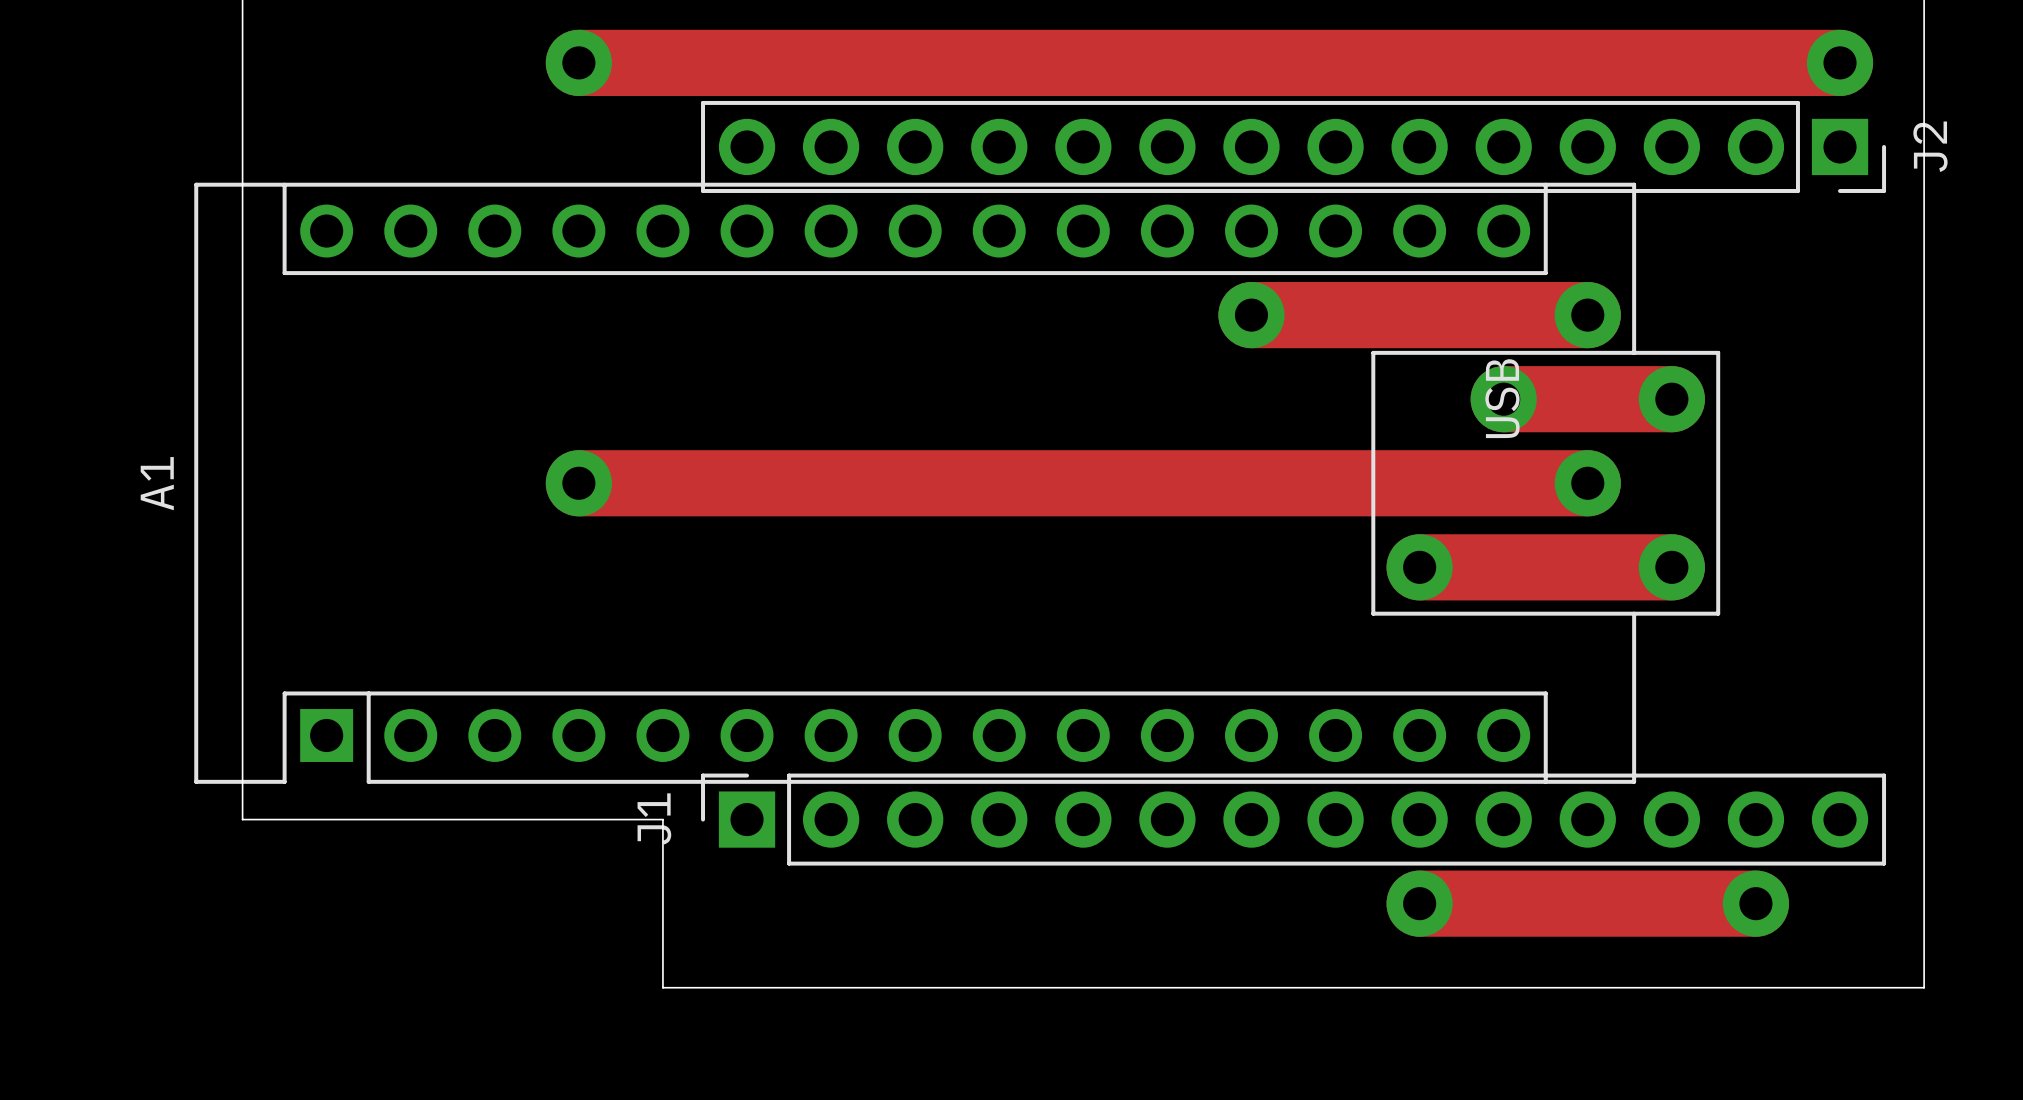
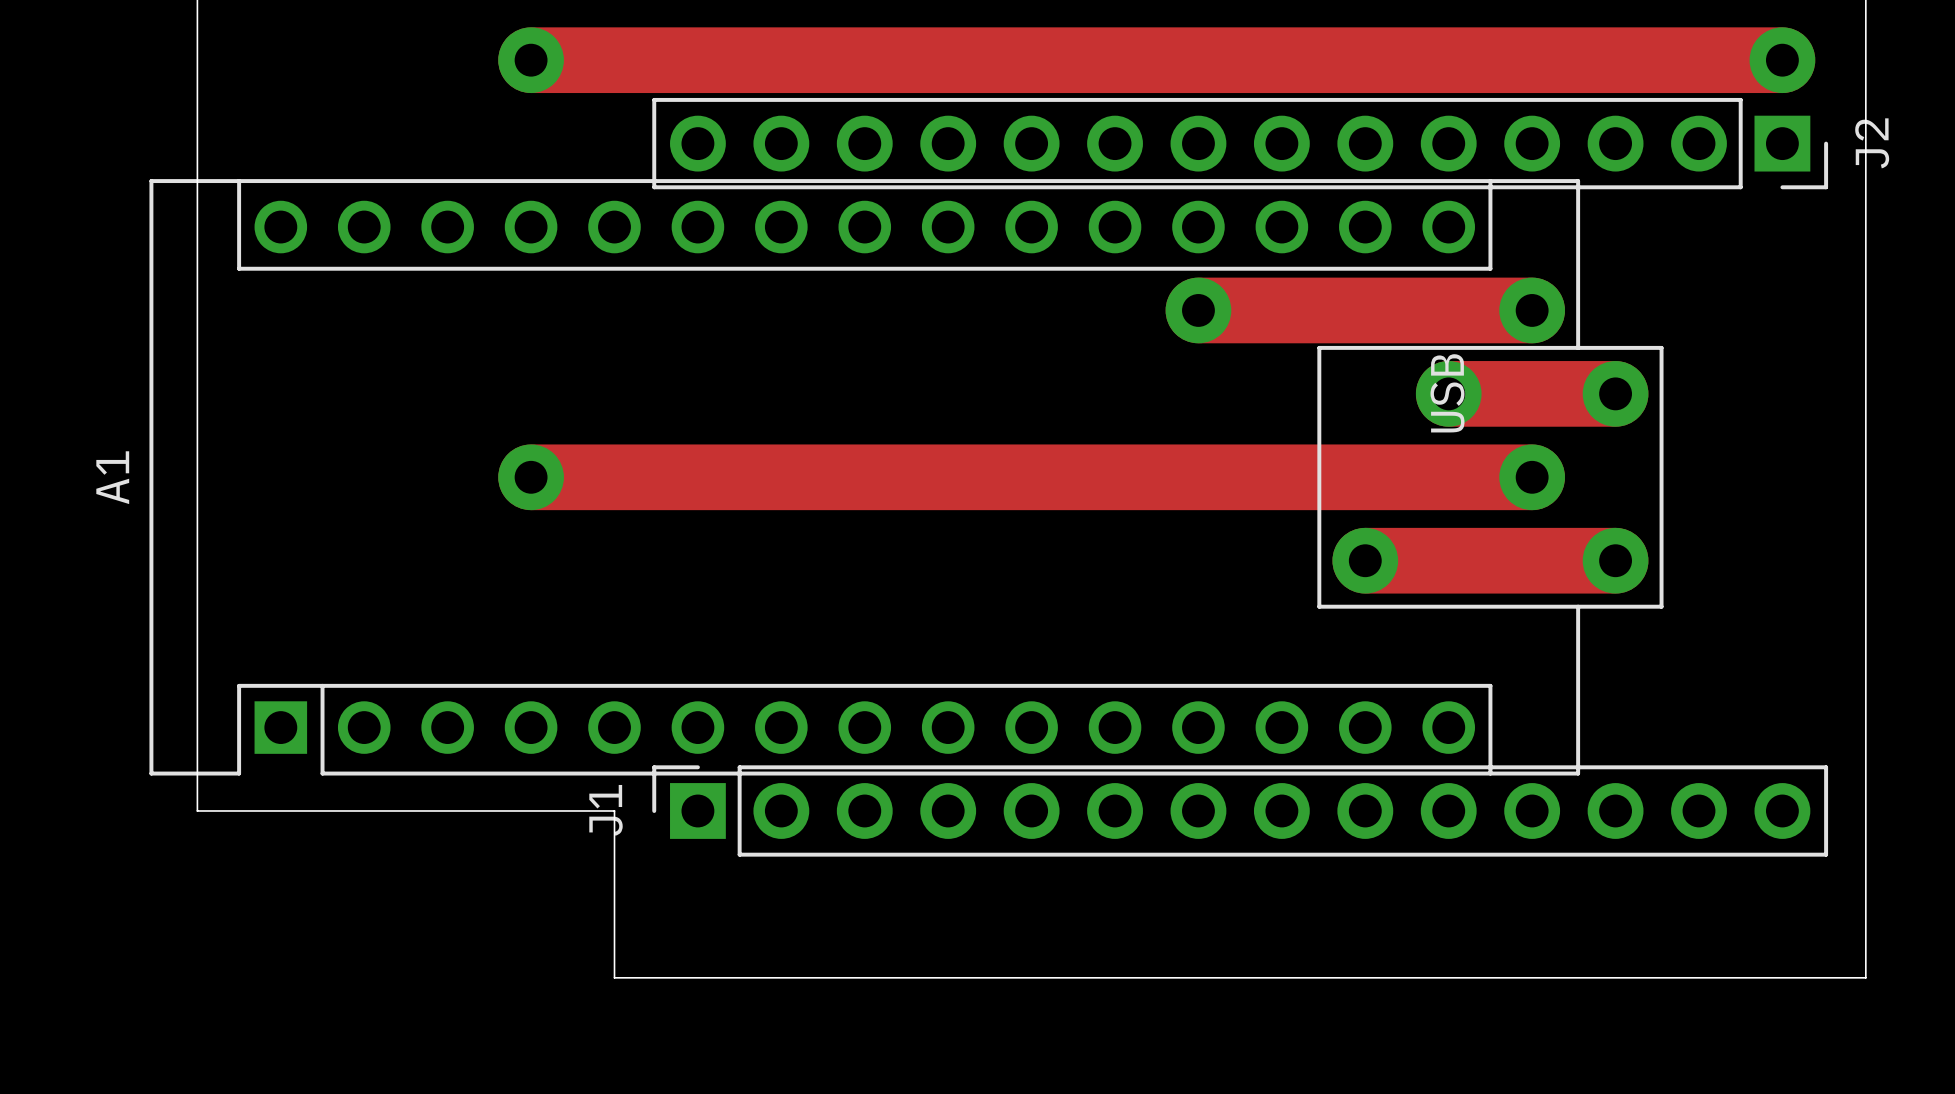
track: (1419, 903) (1755, 903) -> none
via: (1419, 903) -> none
via: (1755, 903) -> none

